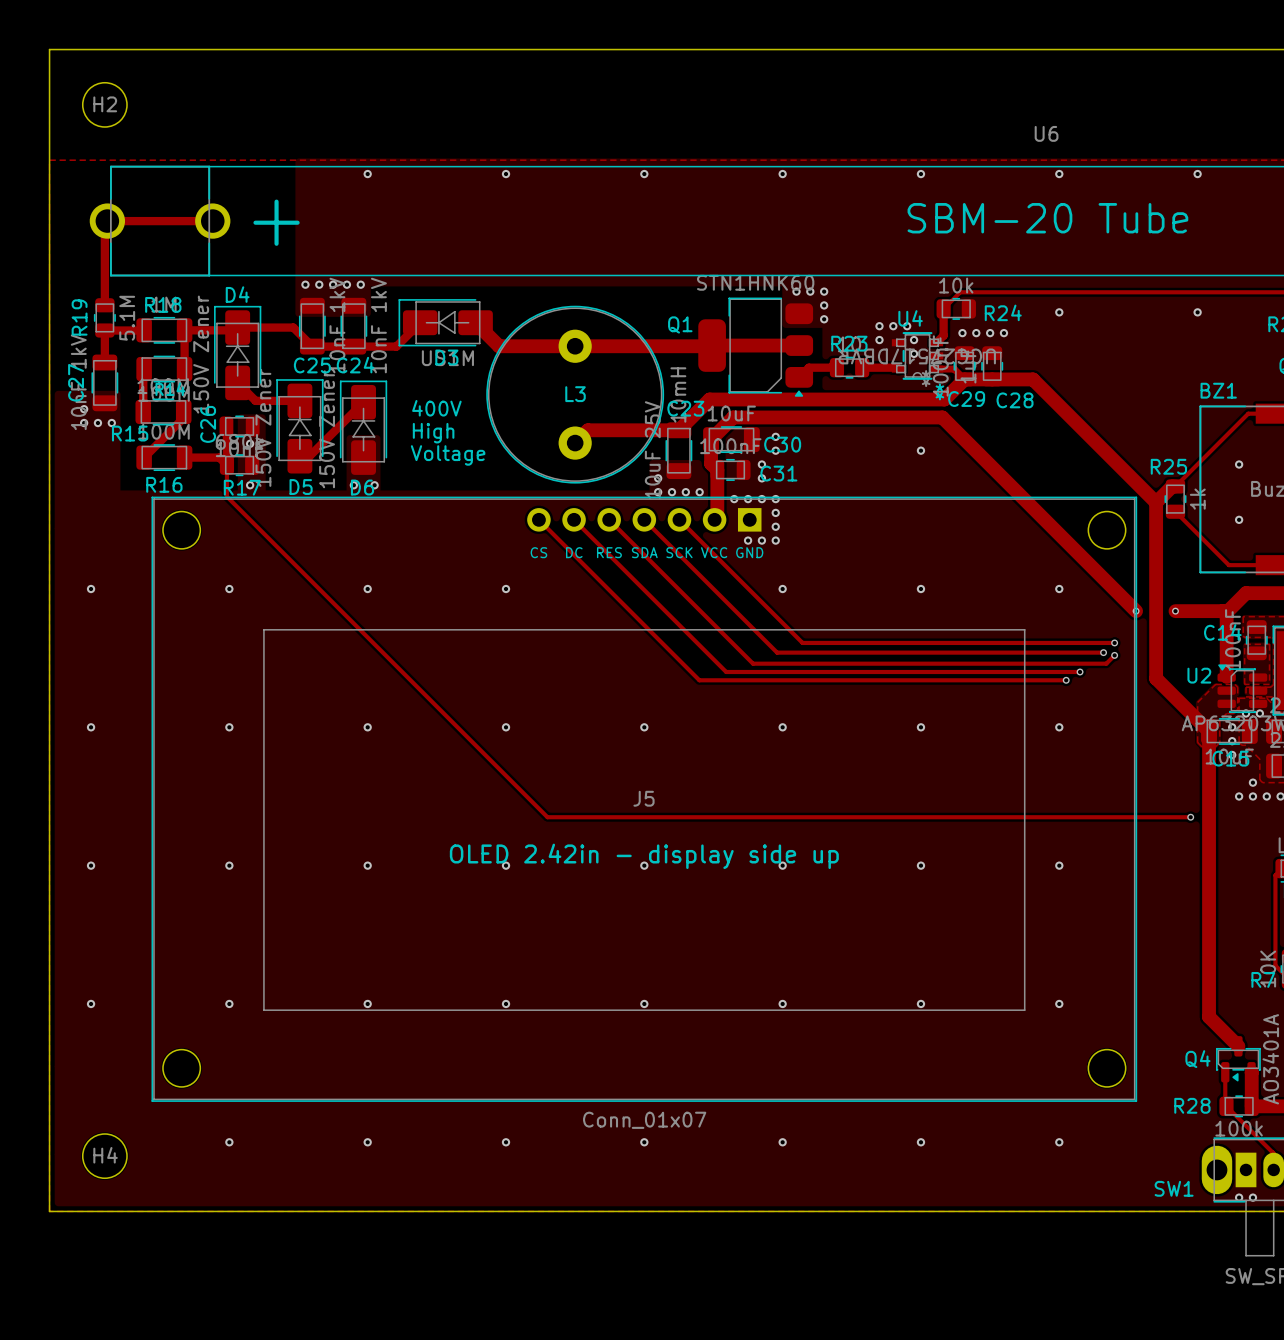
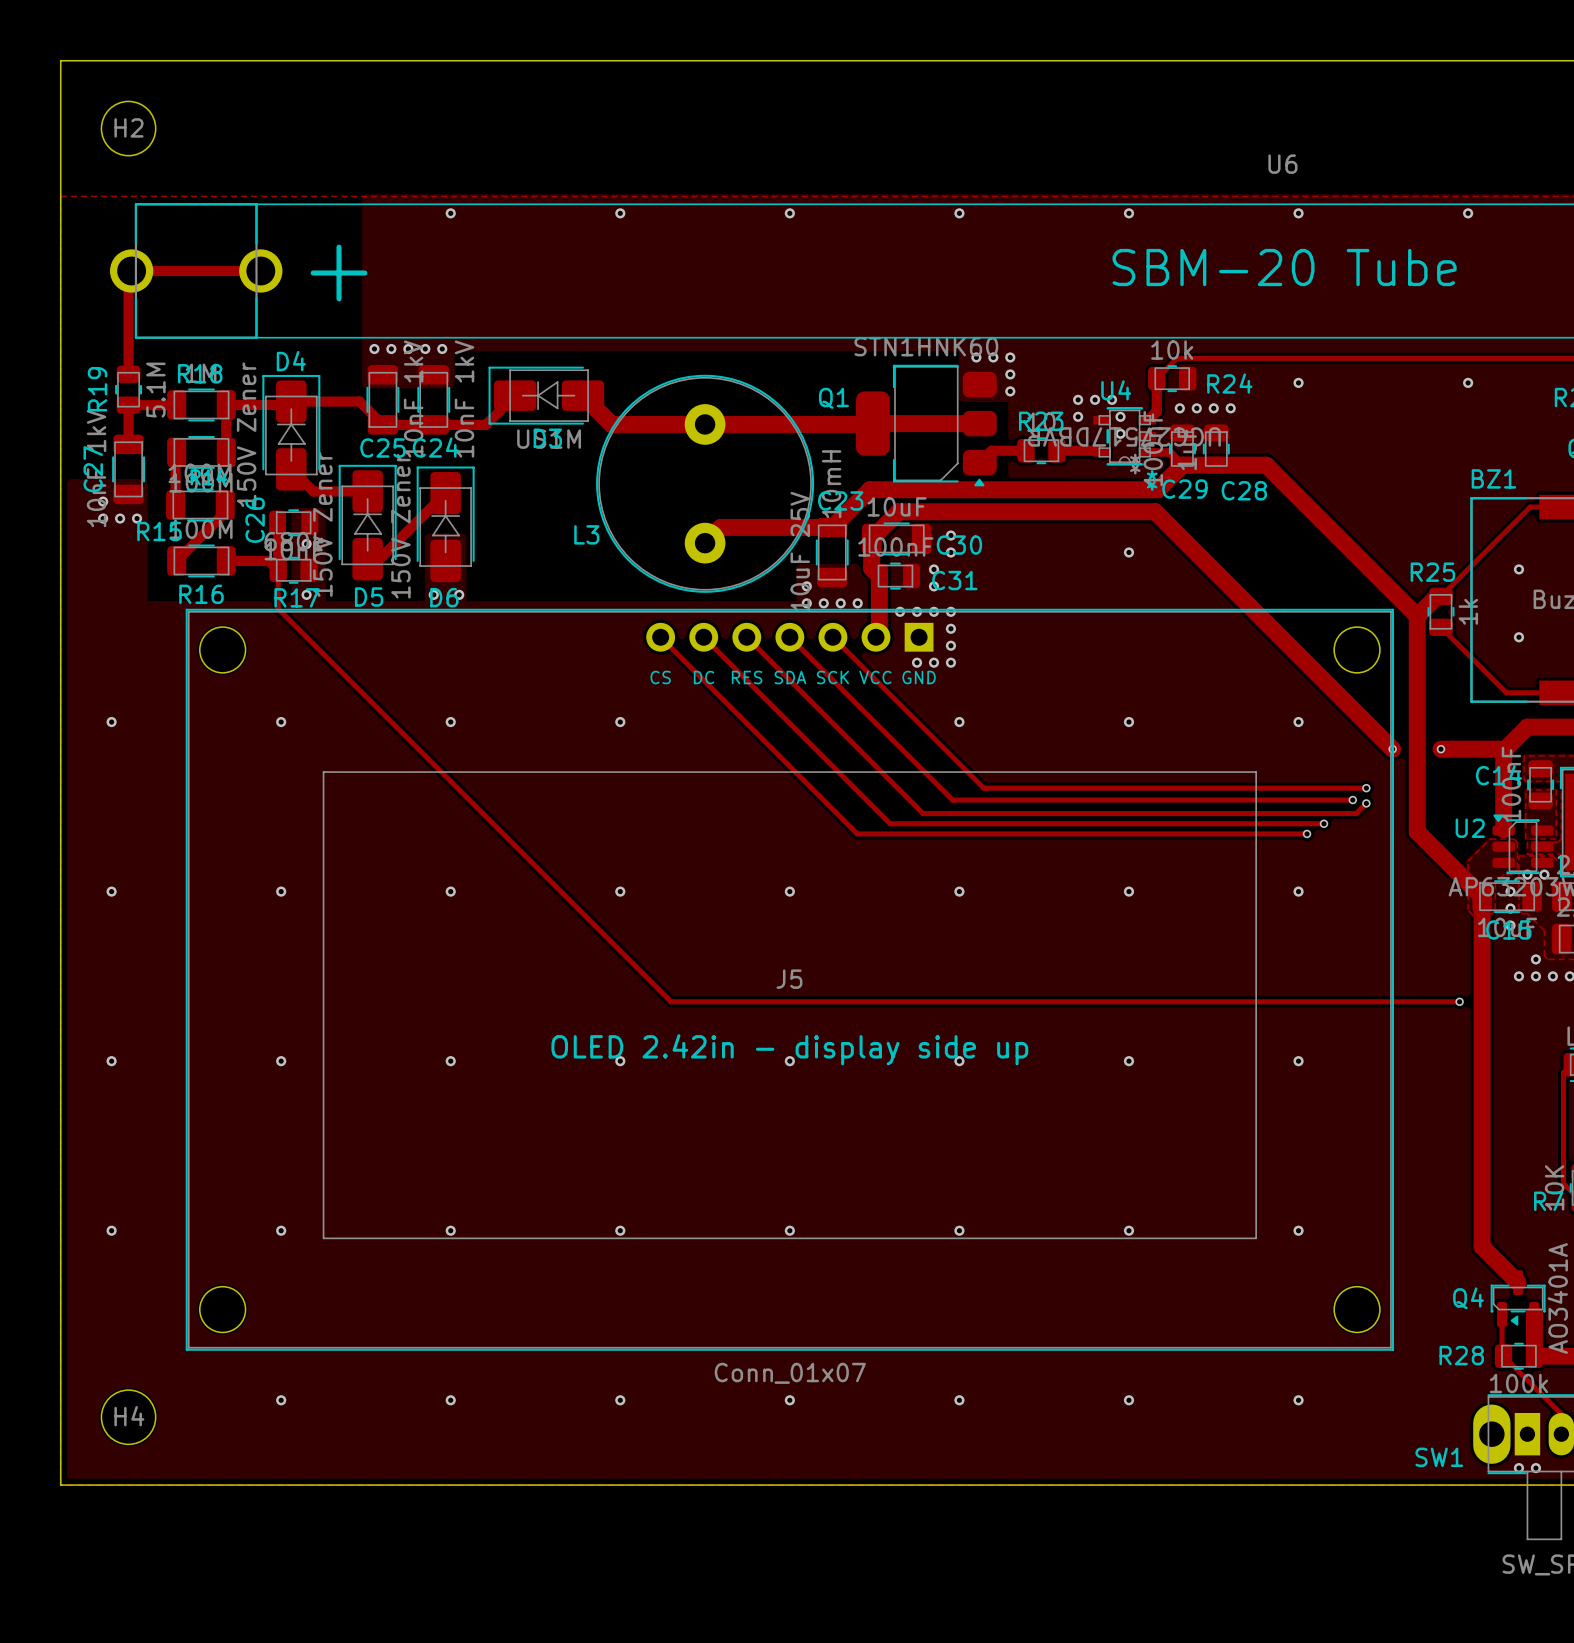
L3 name position: L3 (575, 394) -> L3 (586, 534)
text: 400V (436, 408) -> none
text: High (433, 433) -> none
text: Voltage (448, 455) -> none

